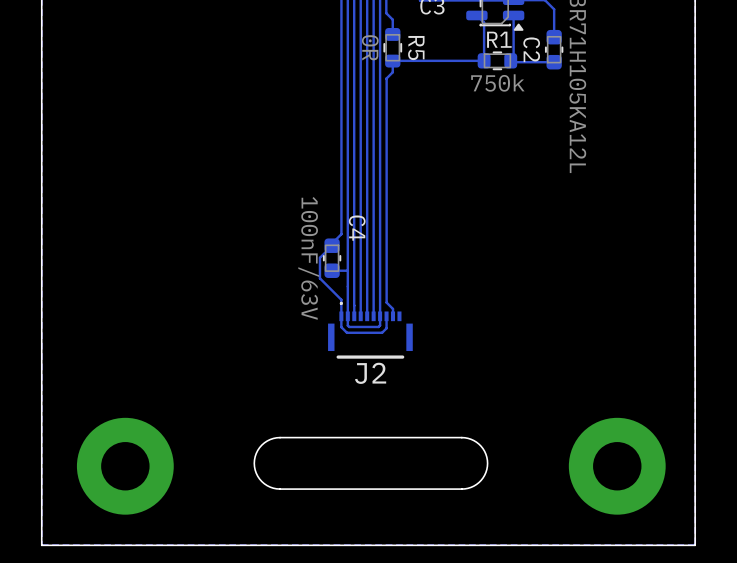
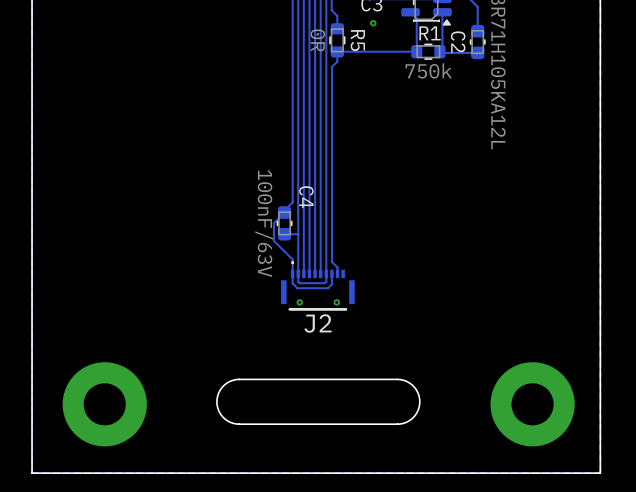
via: none -> (373, 23)
via: none -> (299, 302)
via: none -> (336, 302)

